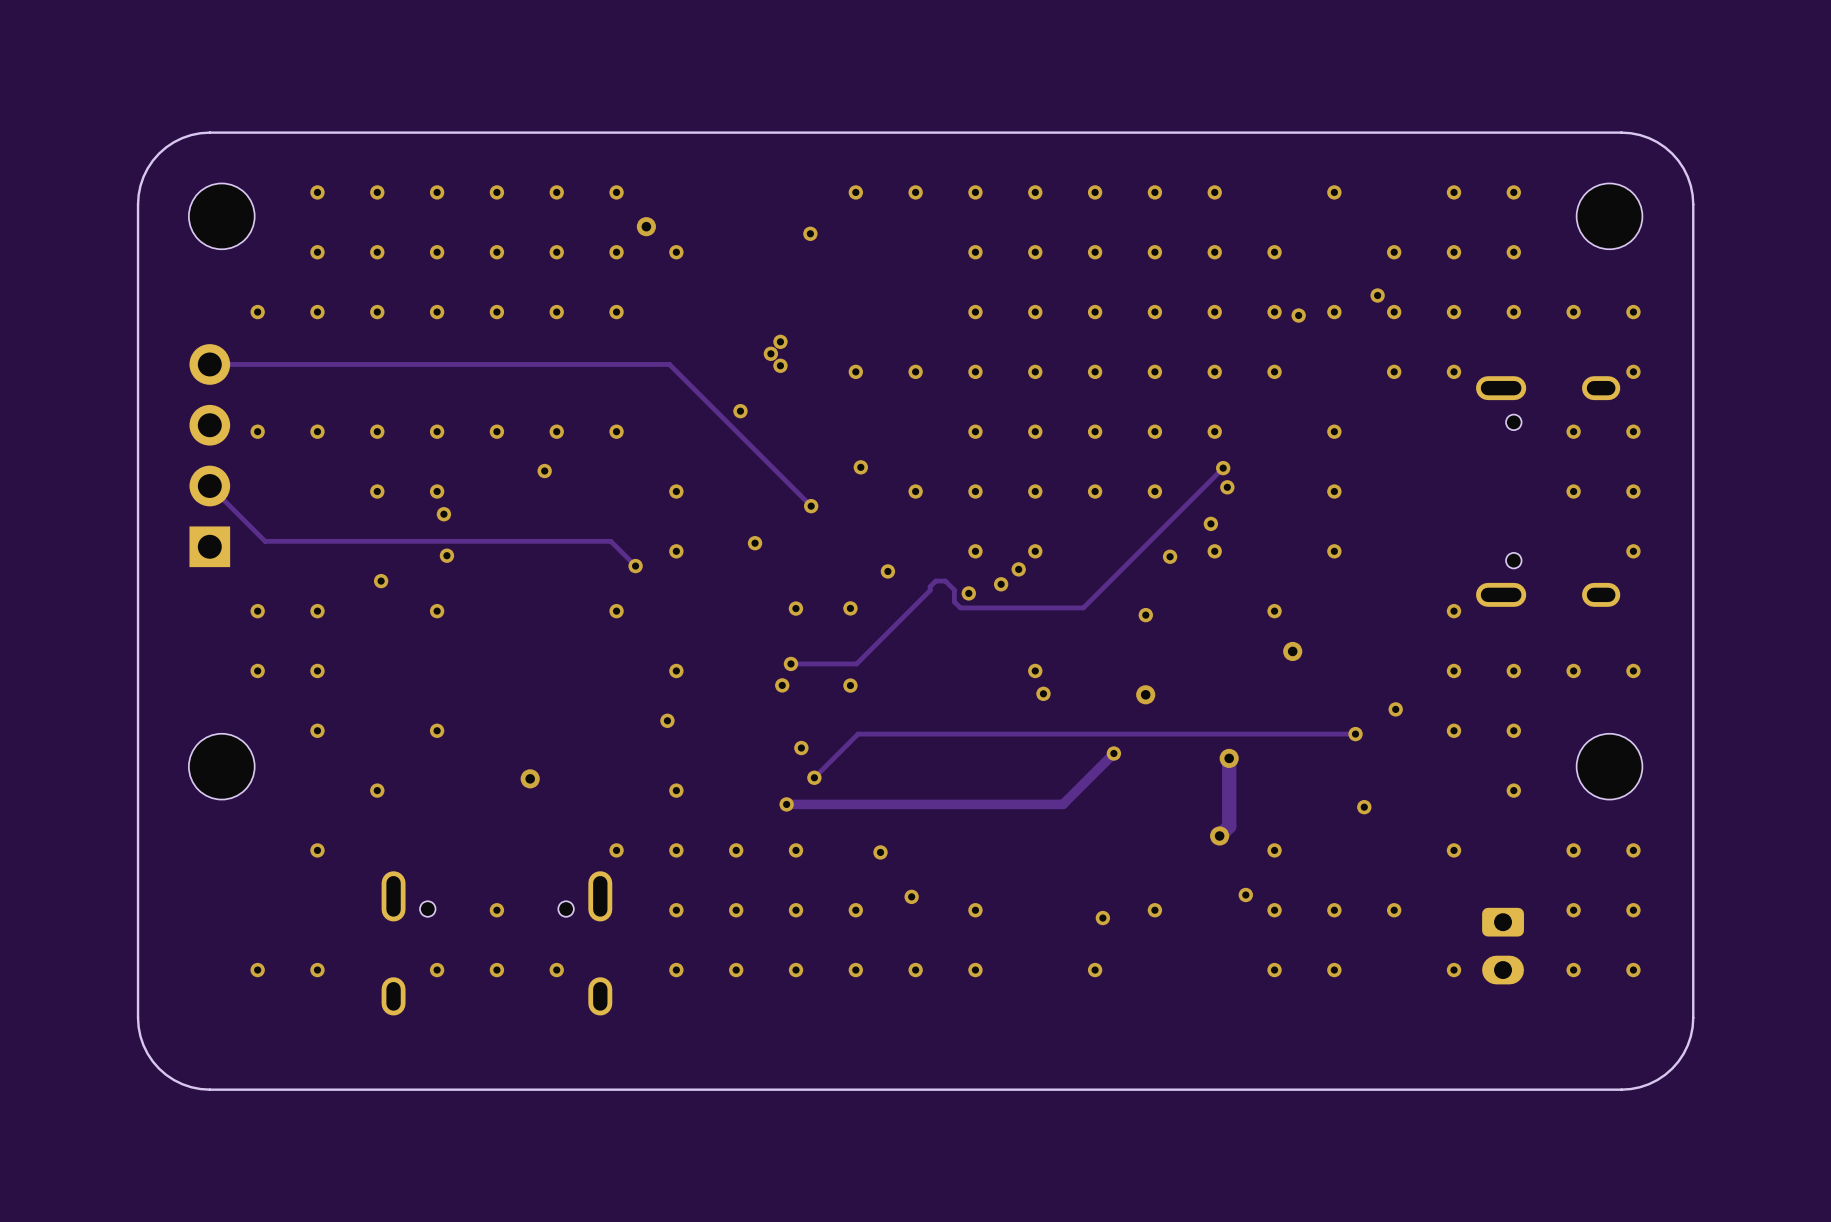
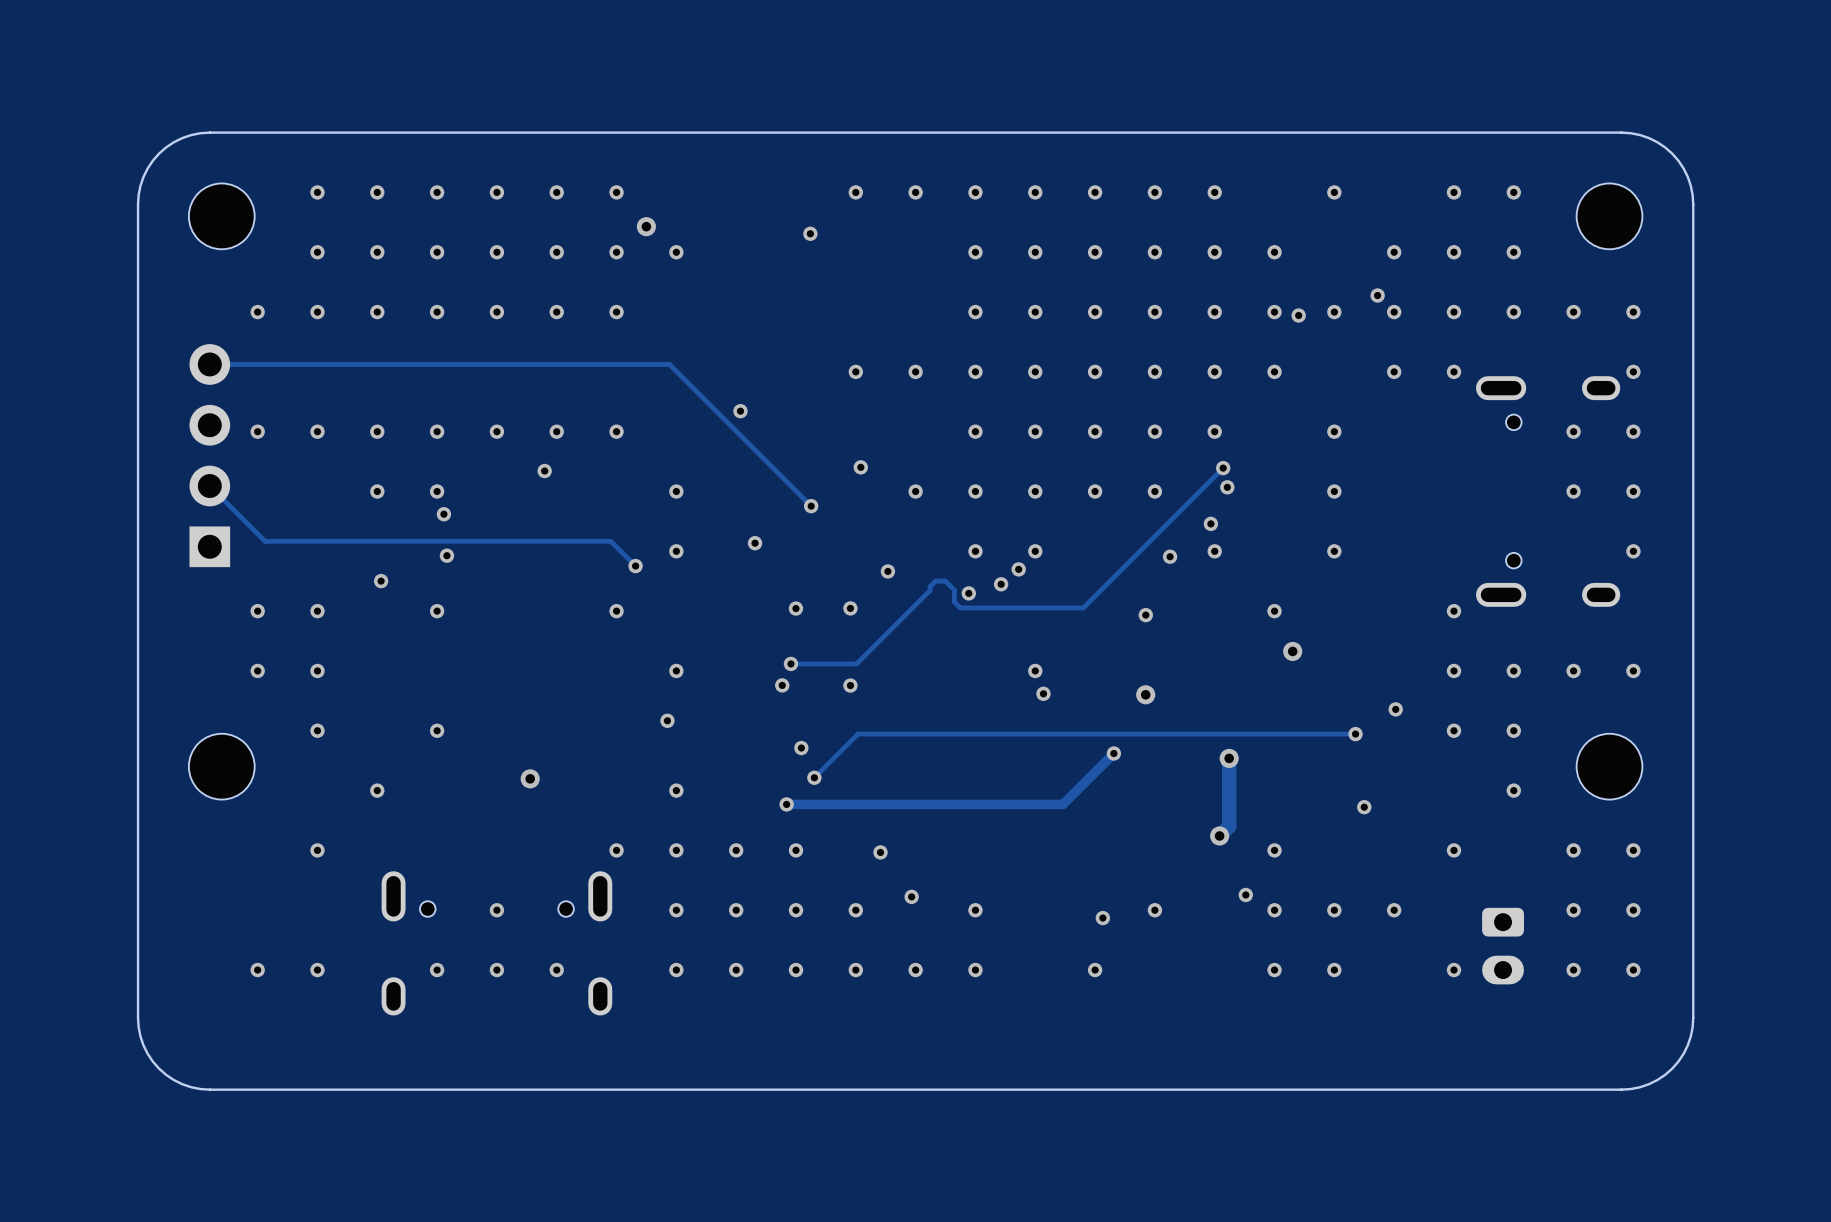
via: (780, 341) -> none
via: (770, 353) -> none
via: (780, 365) -> none

